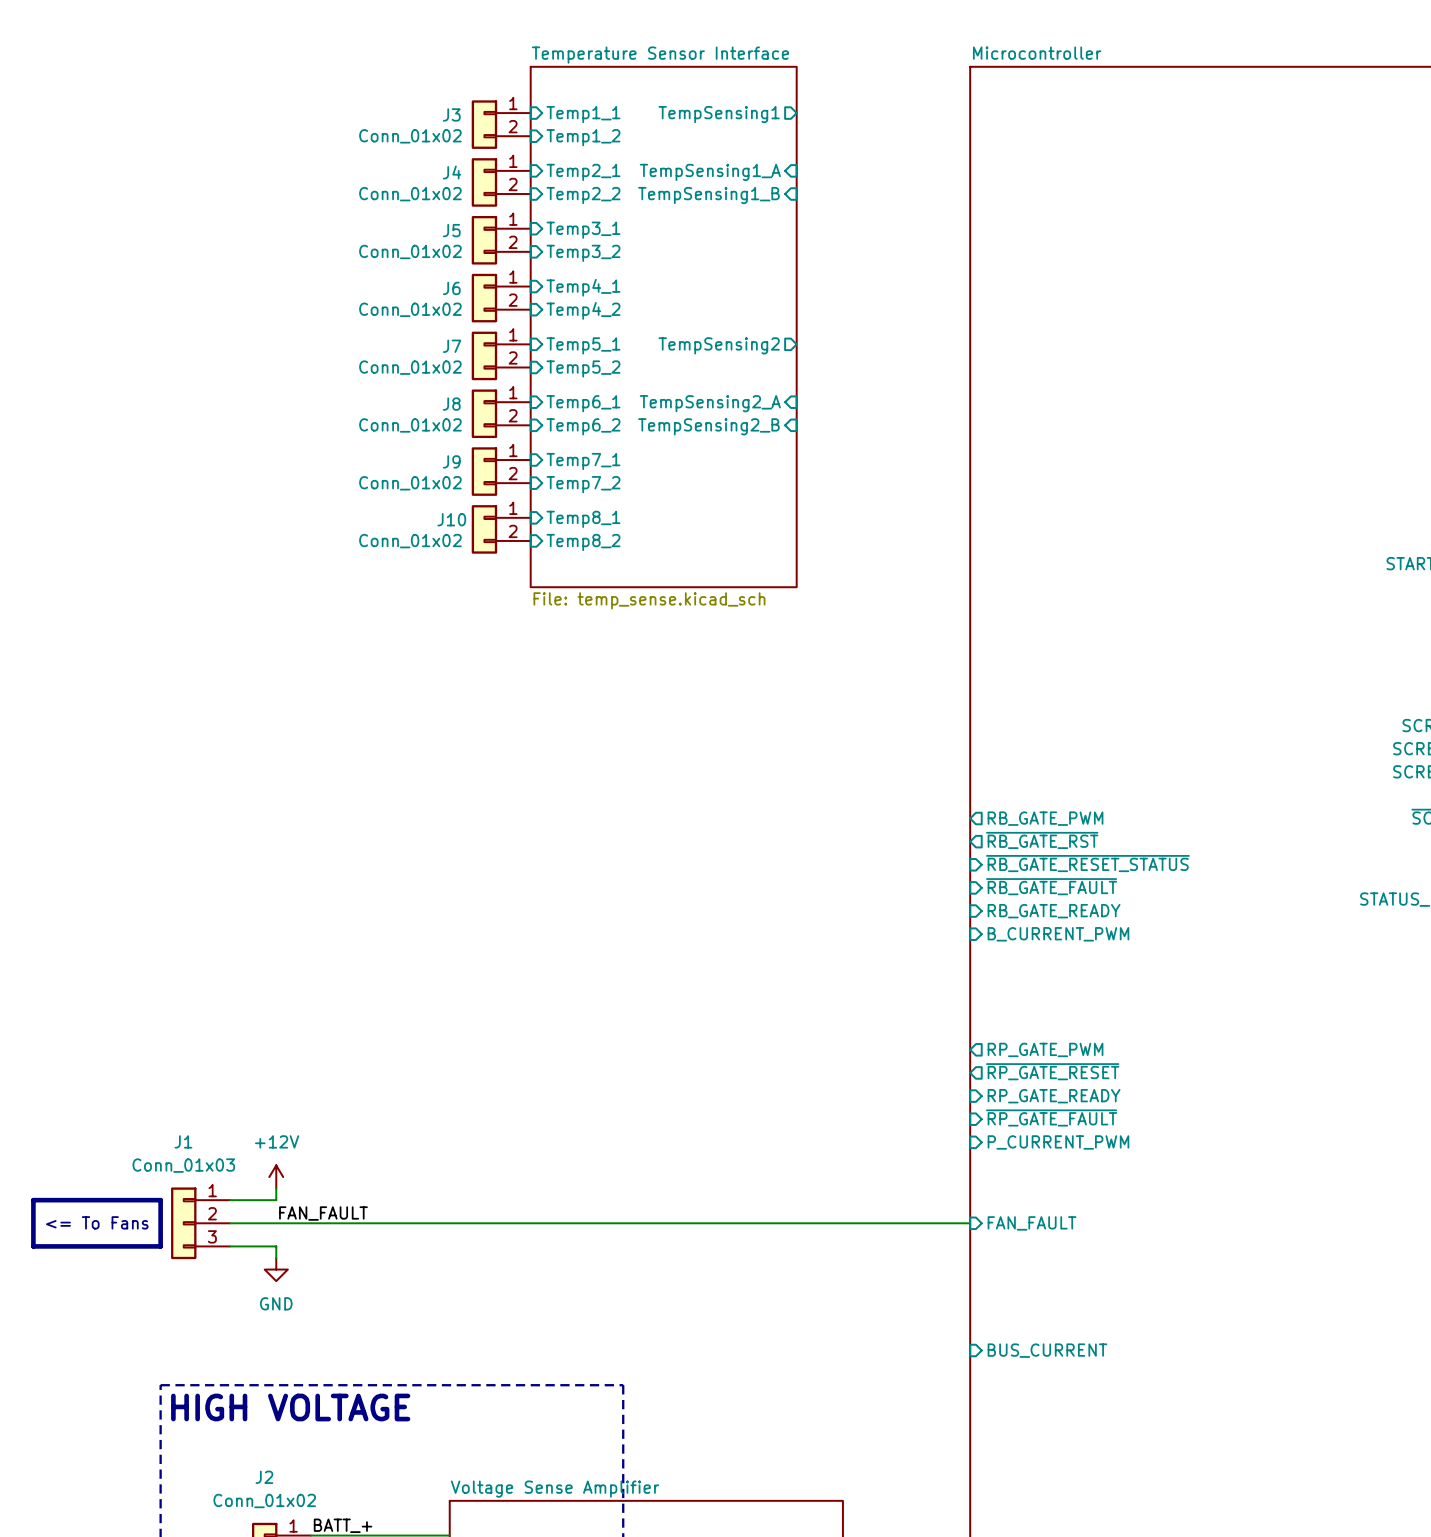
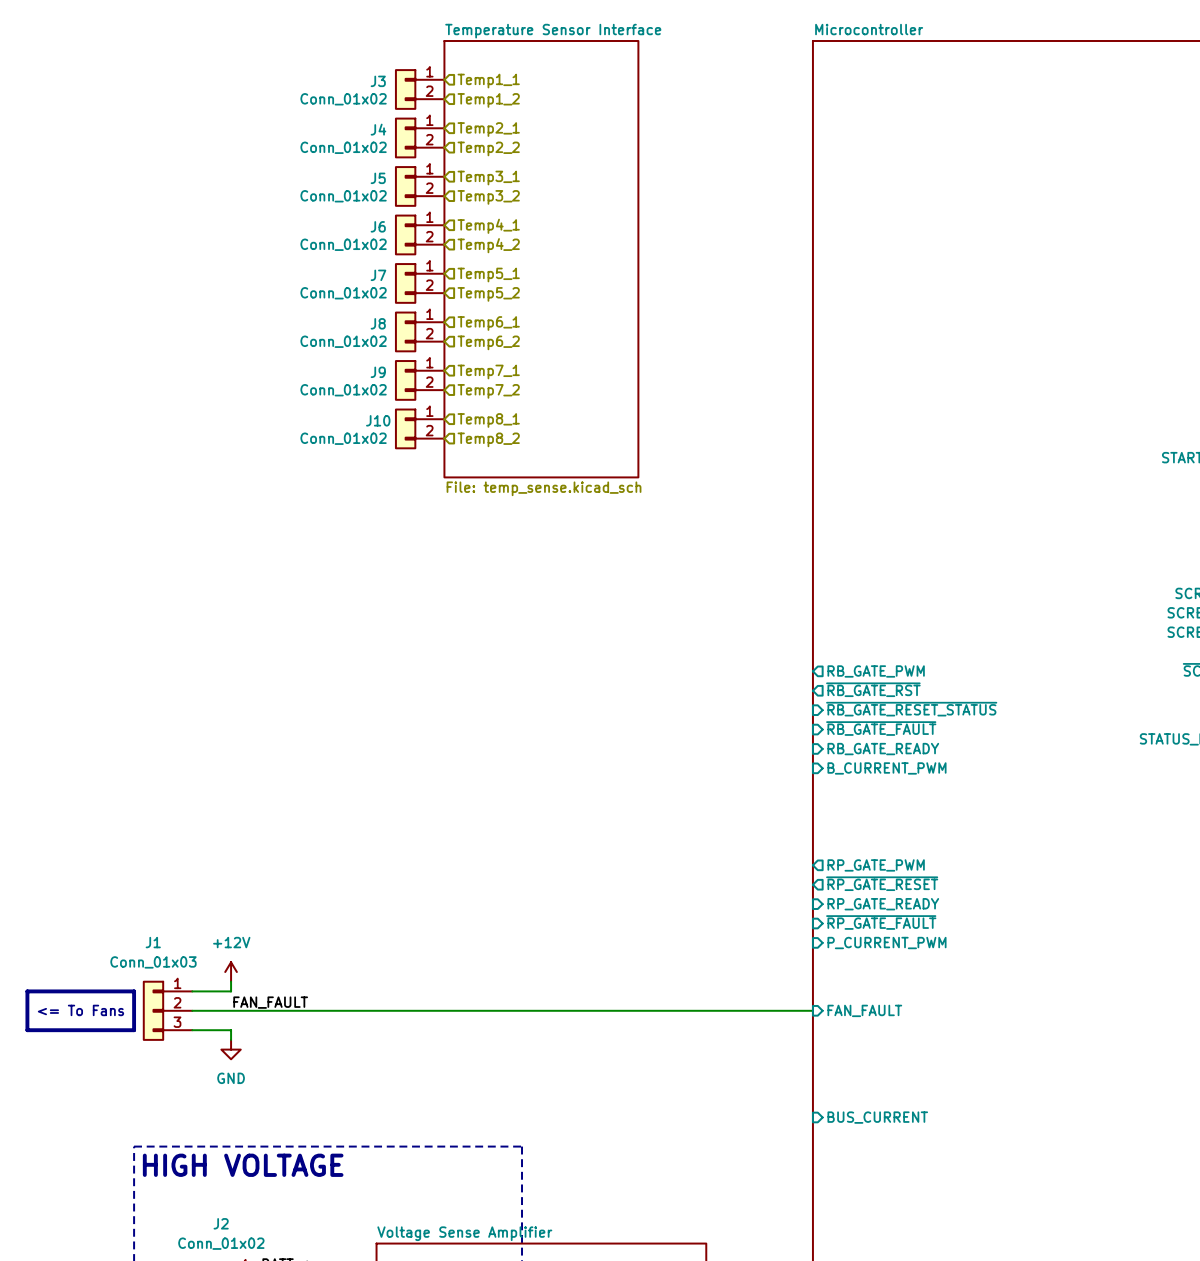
sheet pin: Temp1_1 (583, 114) -> none
hierarchical label: none -> Temp1_1 (488, 81)
sheet pin: TempSensing1 (719, 114) -> none
sheet pin: Temp1_2 (583, 137) -> none
hierarchical label: none -> Temp1_2 (488, 100)
sheet pin: Temp2_1 (583, 172) -> none
hierarchical label: none -> Temp2_1 (488, 129)
sheet pin: TempSensing1_A (710, 172) -> none
sheet pin: Temp2_2 (583, 195) -> none
hierarchical label: none -> Temp2_2 (488, 148)
sheet pin: TempSensing1_B (708, 195) -> none
sheet pin: Temp3_1 (583, 230) -> none
hierarchical label: none -> Temp3_1 (488, 178)
sheet pin: Temp3_2 (583, 253) -> none
hierarchical label: none -> Temp3_2 (488, 197)
sheet pin: Temp4_1 (583, 287) -> none
hierarchical label: none -> Temp4_1 (488, 226)
sheet pin: Temp4_2 (583, 310) -> none
hierarchical label: none -> Temp4_2 (488, 245)
sheet Temperature Sensor Interface: none -> File: temp_sense.kicad_sch (541, 259)
sheet Temperature Sensor Interface: File: temp_sense.kicad_sch (663, 327) -> none
sheet pin: Temp5_1 (583, 345) -> none
hierarchical label: none -> Temp5_1 (488, 275)
sheet pin: TempSensing2 (719, 345) -> none
sheet pin: Temp5_2 (583, 368) -> none
hierarchical label: none -> Temp5_2 (488, 294)
sheet pin: Temp6_1 (583, 403) -> none
hierarchical label: none -> Temp6_1 (488, 323)
sheet pin: TempSensing2_A (710, 403) -> none
sheet pin: Temp6_2 (583, 426) -> none
hierarchical label: none -> Temp6_2 (488, 342)
sheet pin: TempSensing2_B (708, 426) -> none
sheet pin: Temp7_1 (583, 461) -> none
hierarchical label: none -> Temp7_1 (488, 371)
sheet pin: Temp7_2 (583, 484) -> none
hierarchical label: none -> Temp7_2 (488, 391)
sheet pin: Temp8_1 (583, 519) -> none
hierarchical label: none -> Temp8_1 (488, 420)
sheet pin: Temp8_2 (583, 542) -> none
hierarchical label: none -> Temp8_2 (488, 439)

